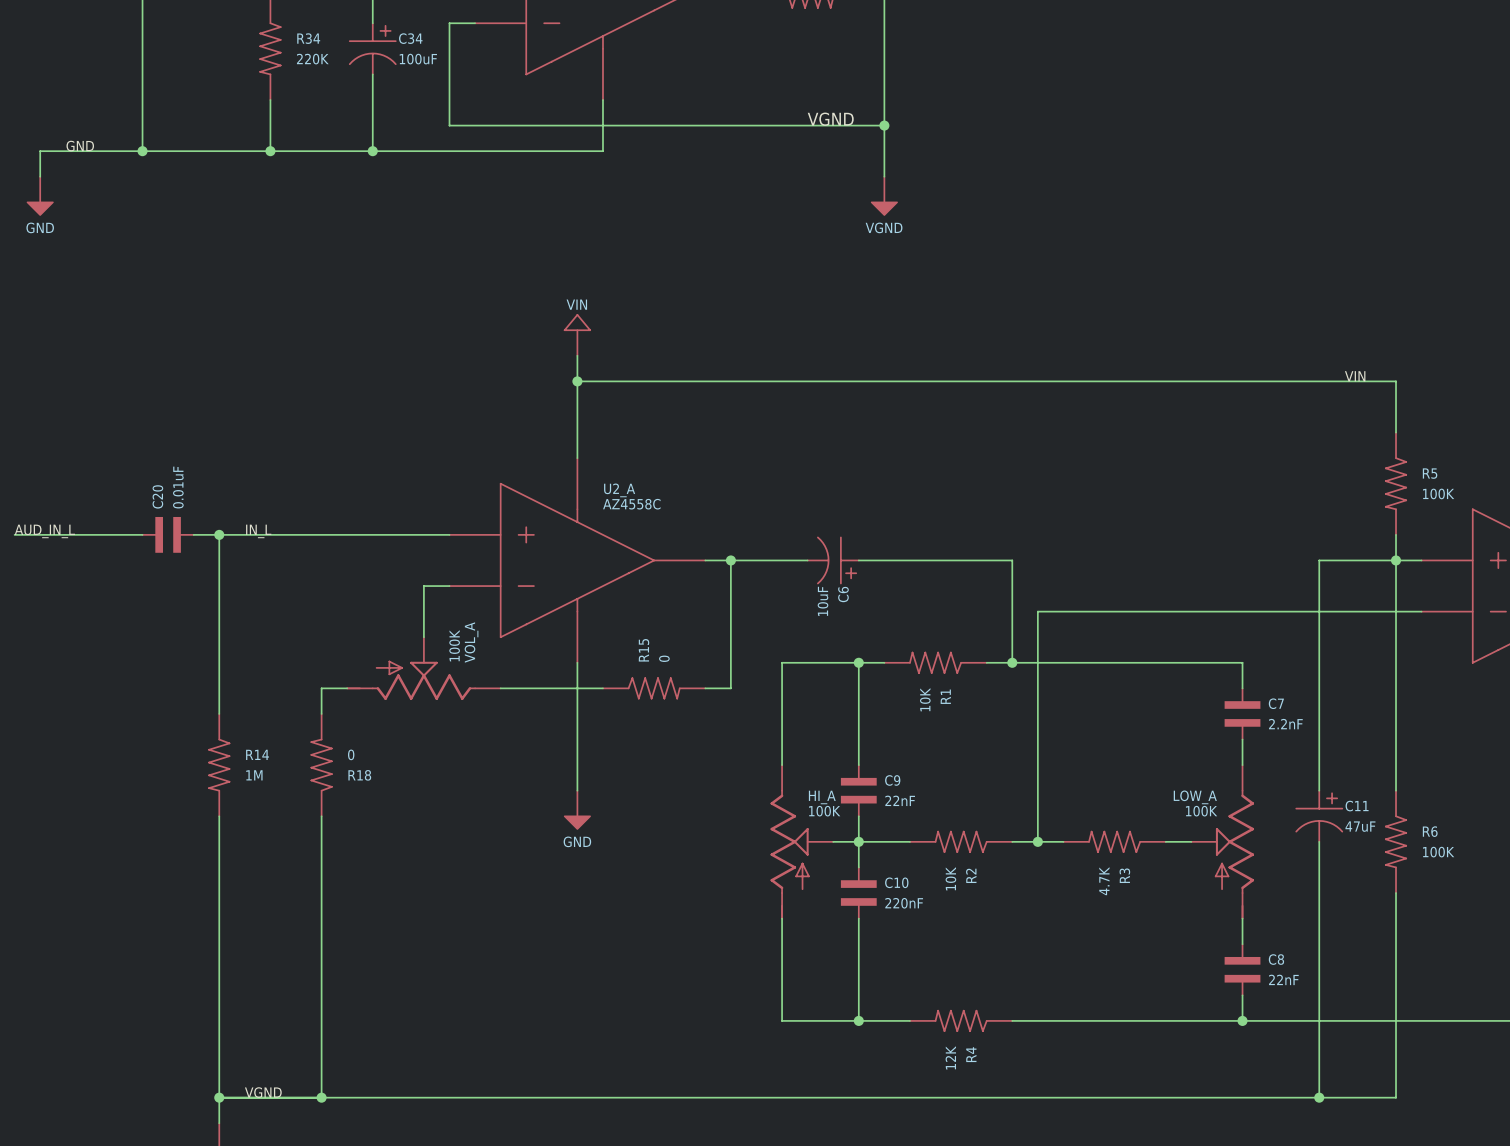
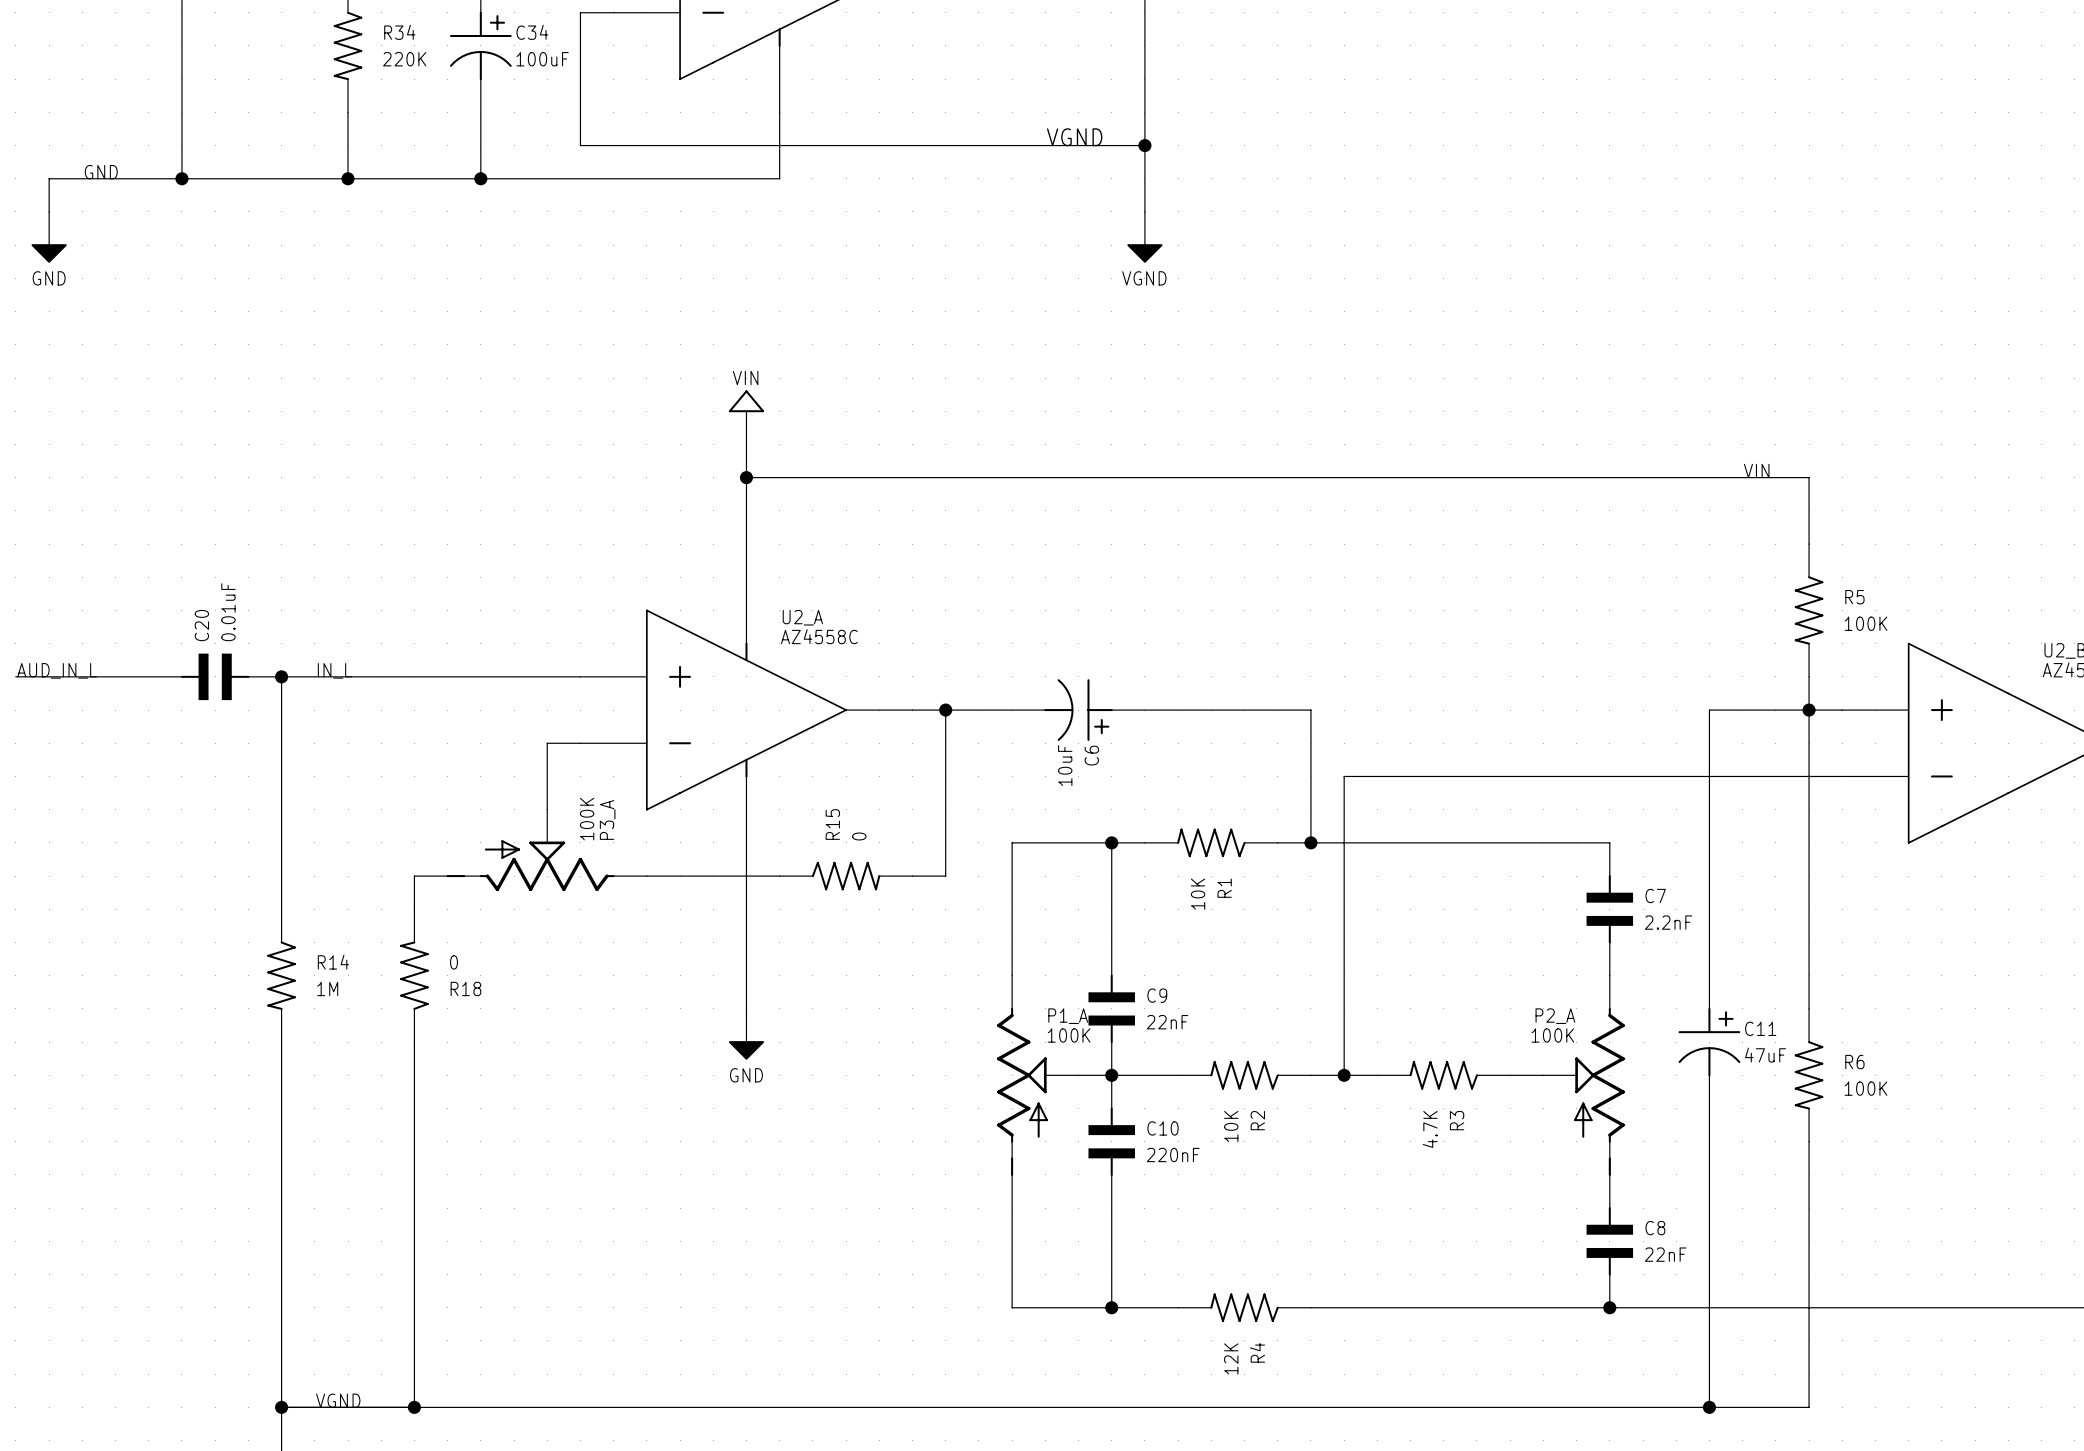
VOL_A name: VOL_A (471, 642) -> P3_A (607, 819)
HI_A name: HI_A (822, 797) -> P1_A (1068, 1016)
LOW_A name: LOW_A (1195, 797) -> P2_A (1555, 1016)

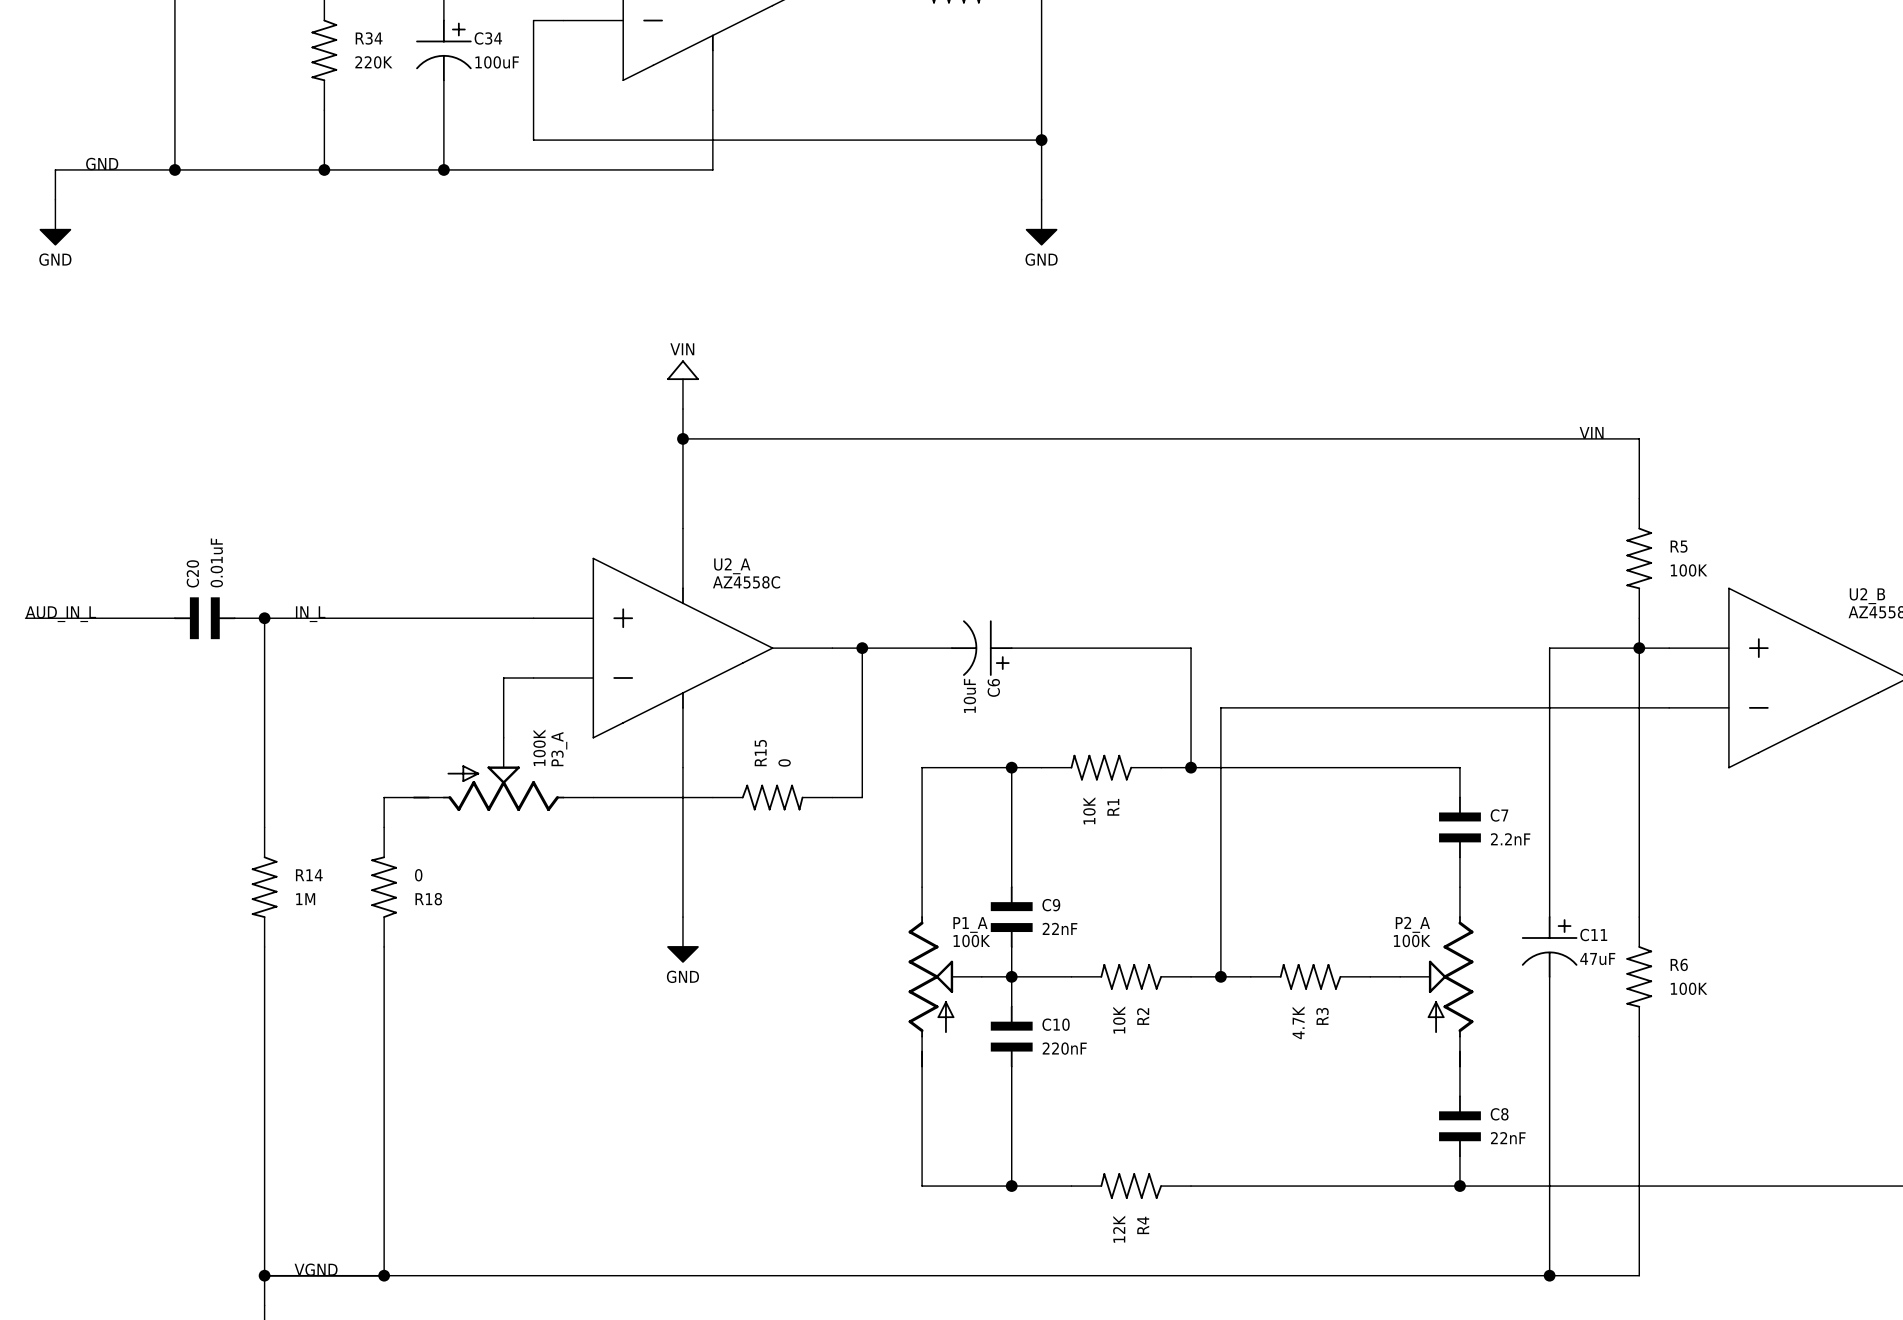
label: VGND (1074, 137) -> none
power symbol: VGND (1144, 237) -> GND (1041, 222)

